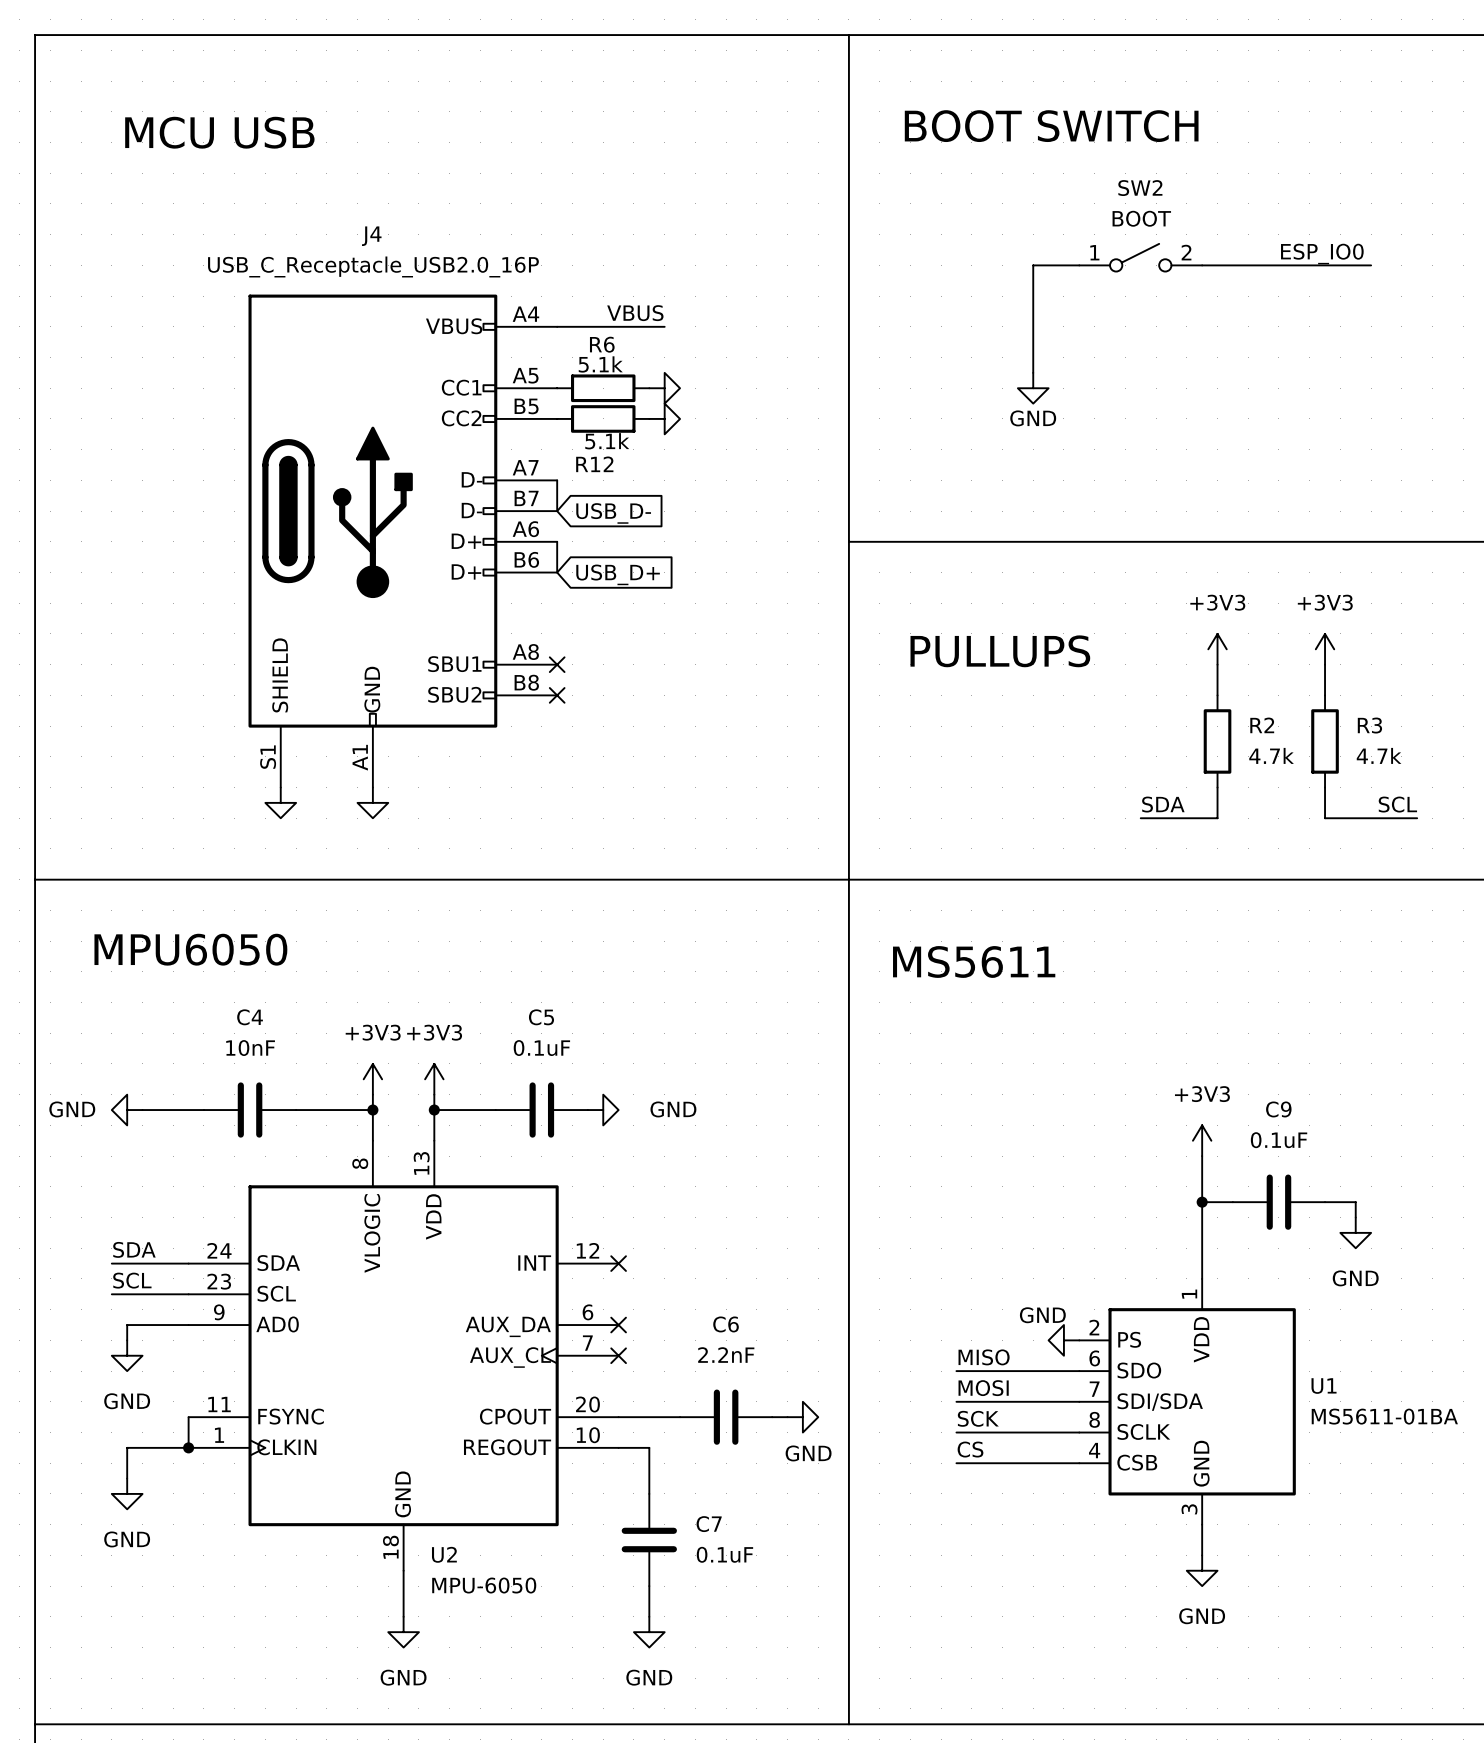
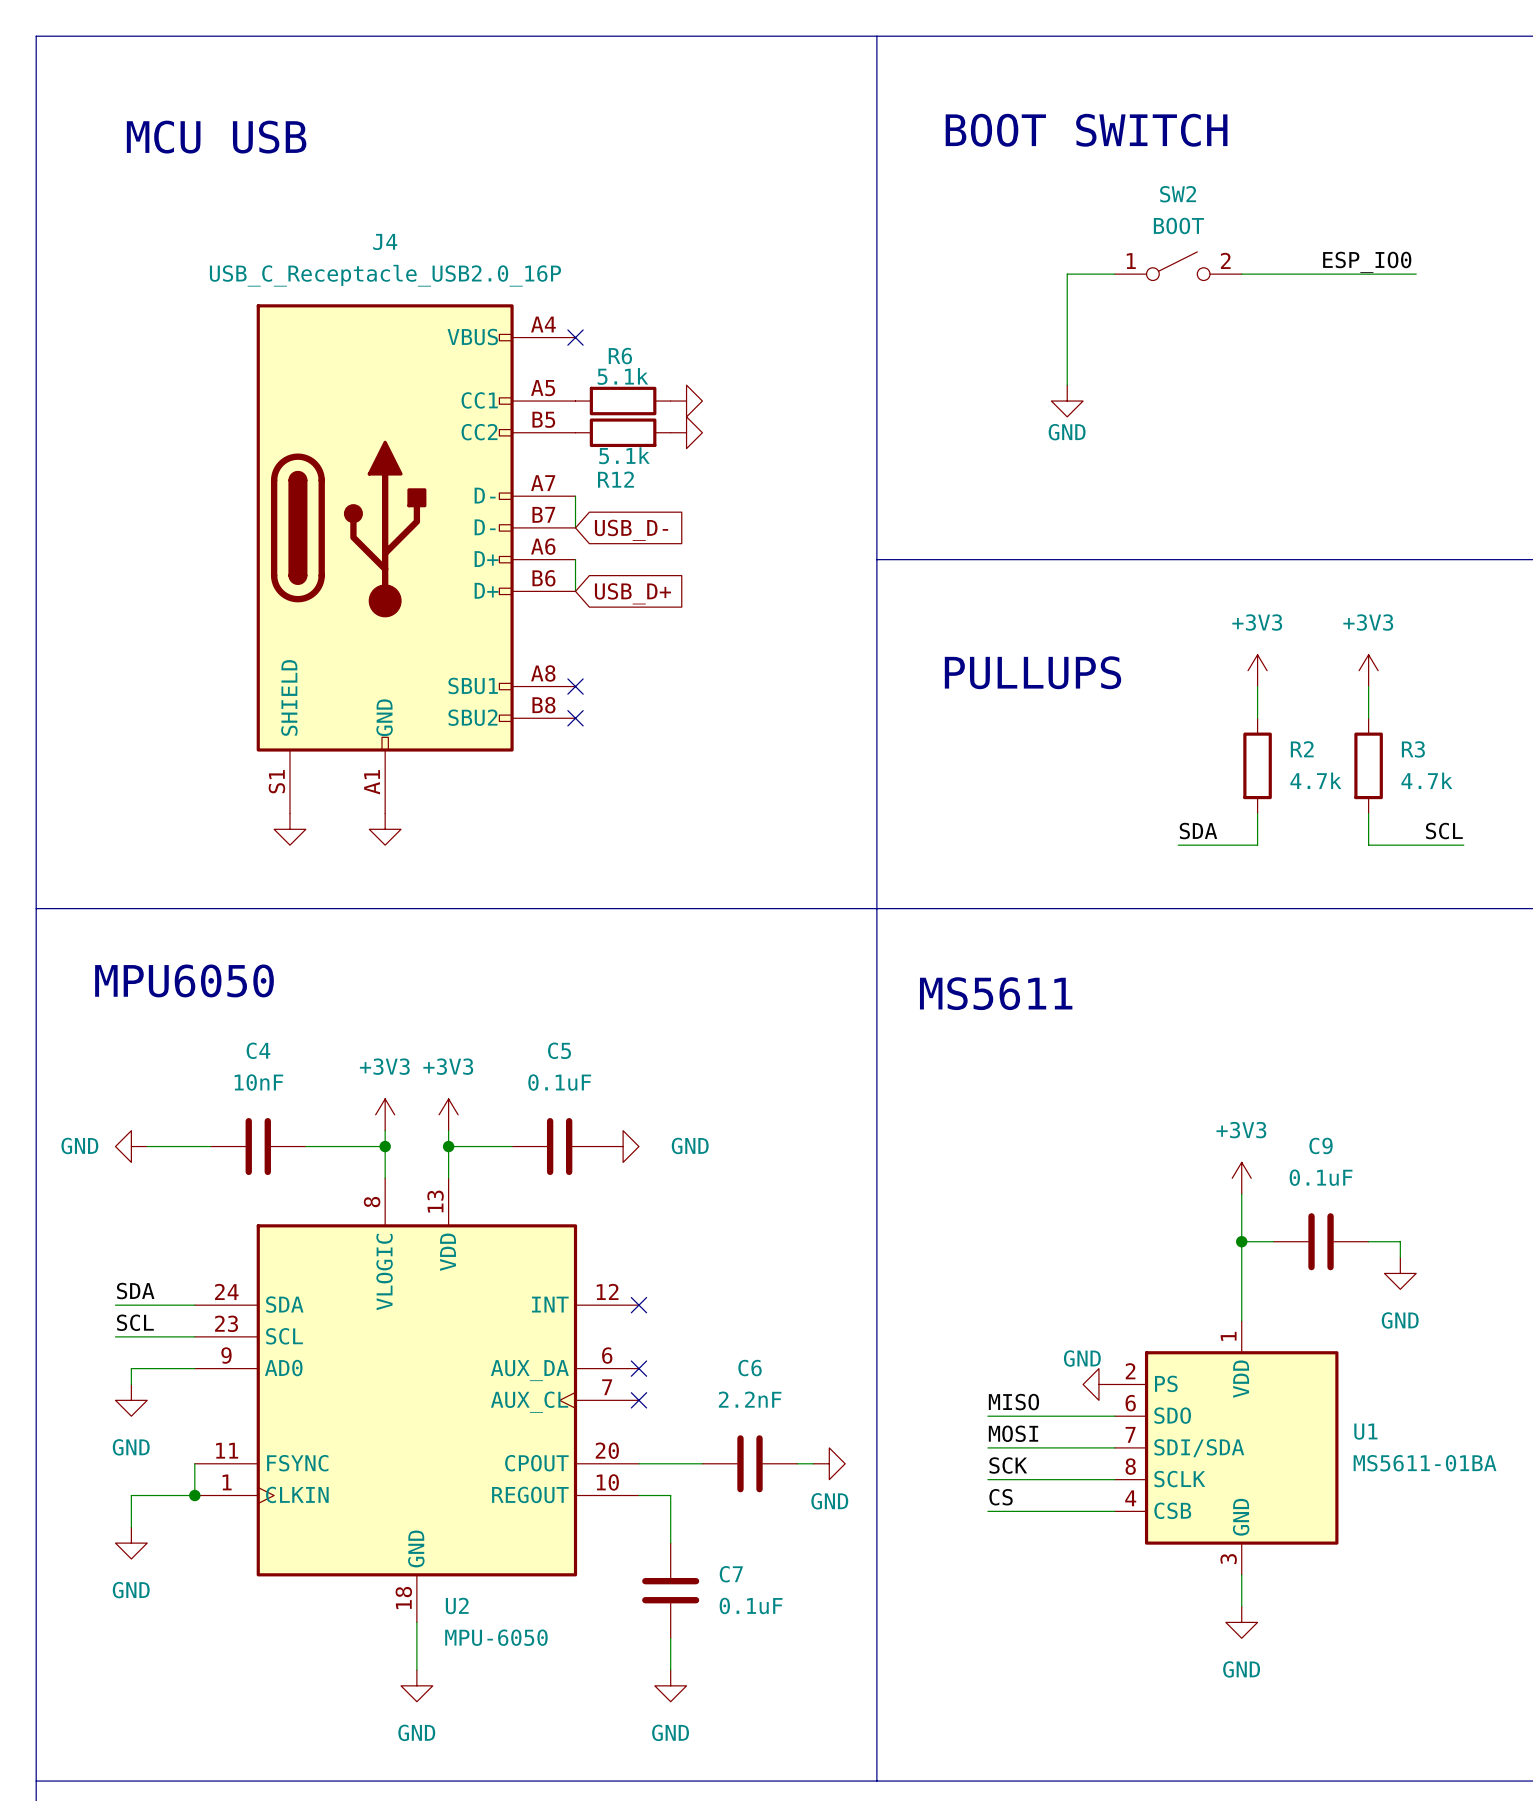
label: VBUS (635, 313) -> none
wire: (557, 326) (664, 326) -> none
no-connect mark: none -> (575, 337)

